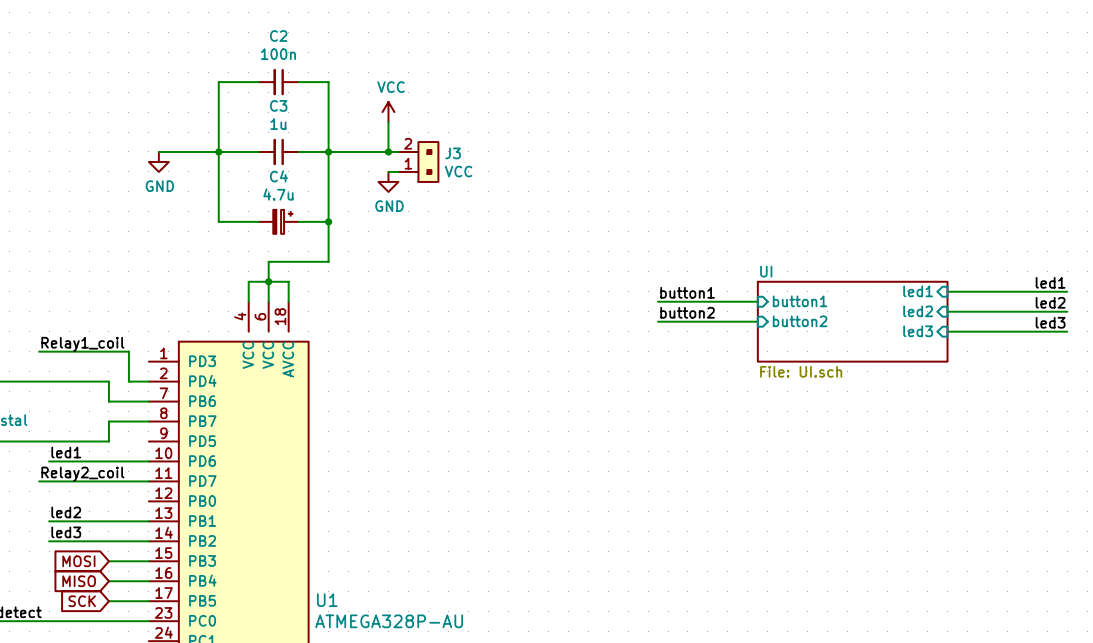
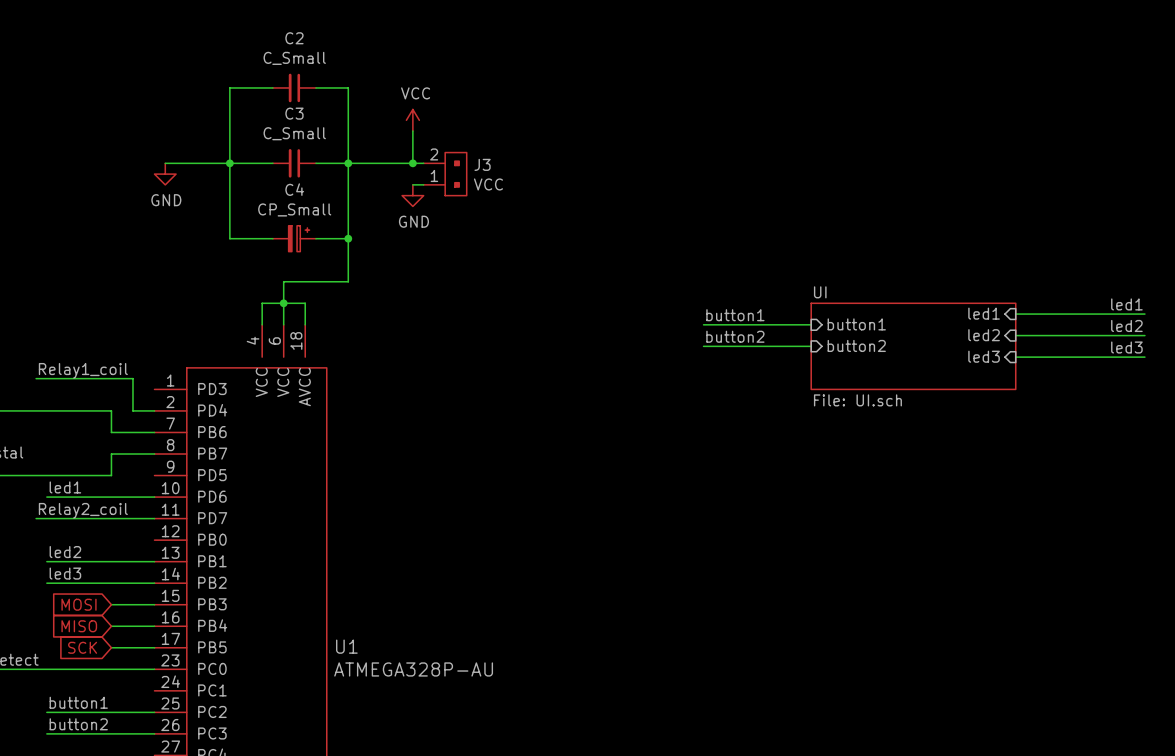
C2 value: 100n (278, 54) -> C_Small (294, 58)
C3 value: 1u (278, 124) -> C_Small (294, 133)
C4 value: 4.7u (278, 194) -> CP_Small (294, 209)

